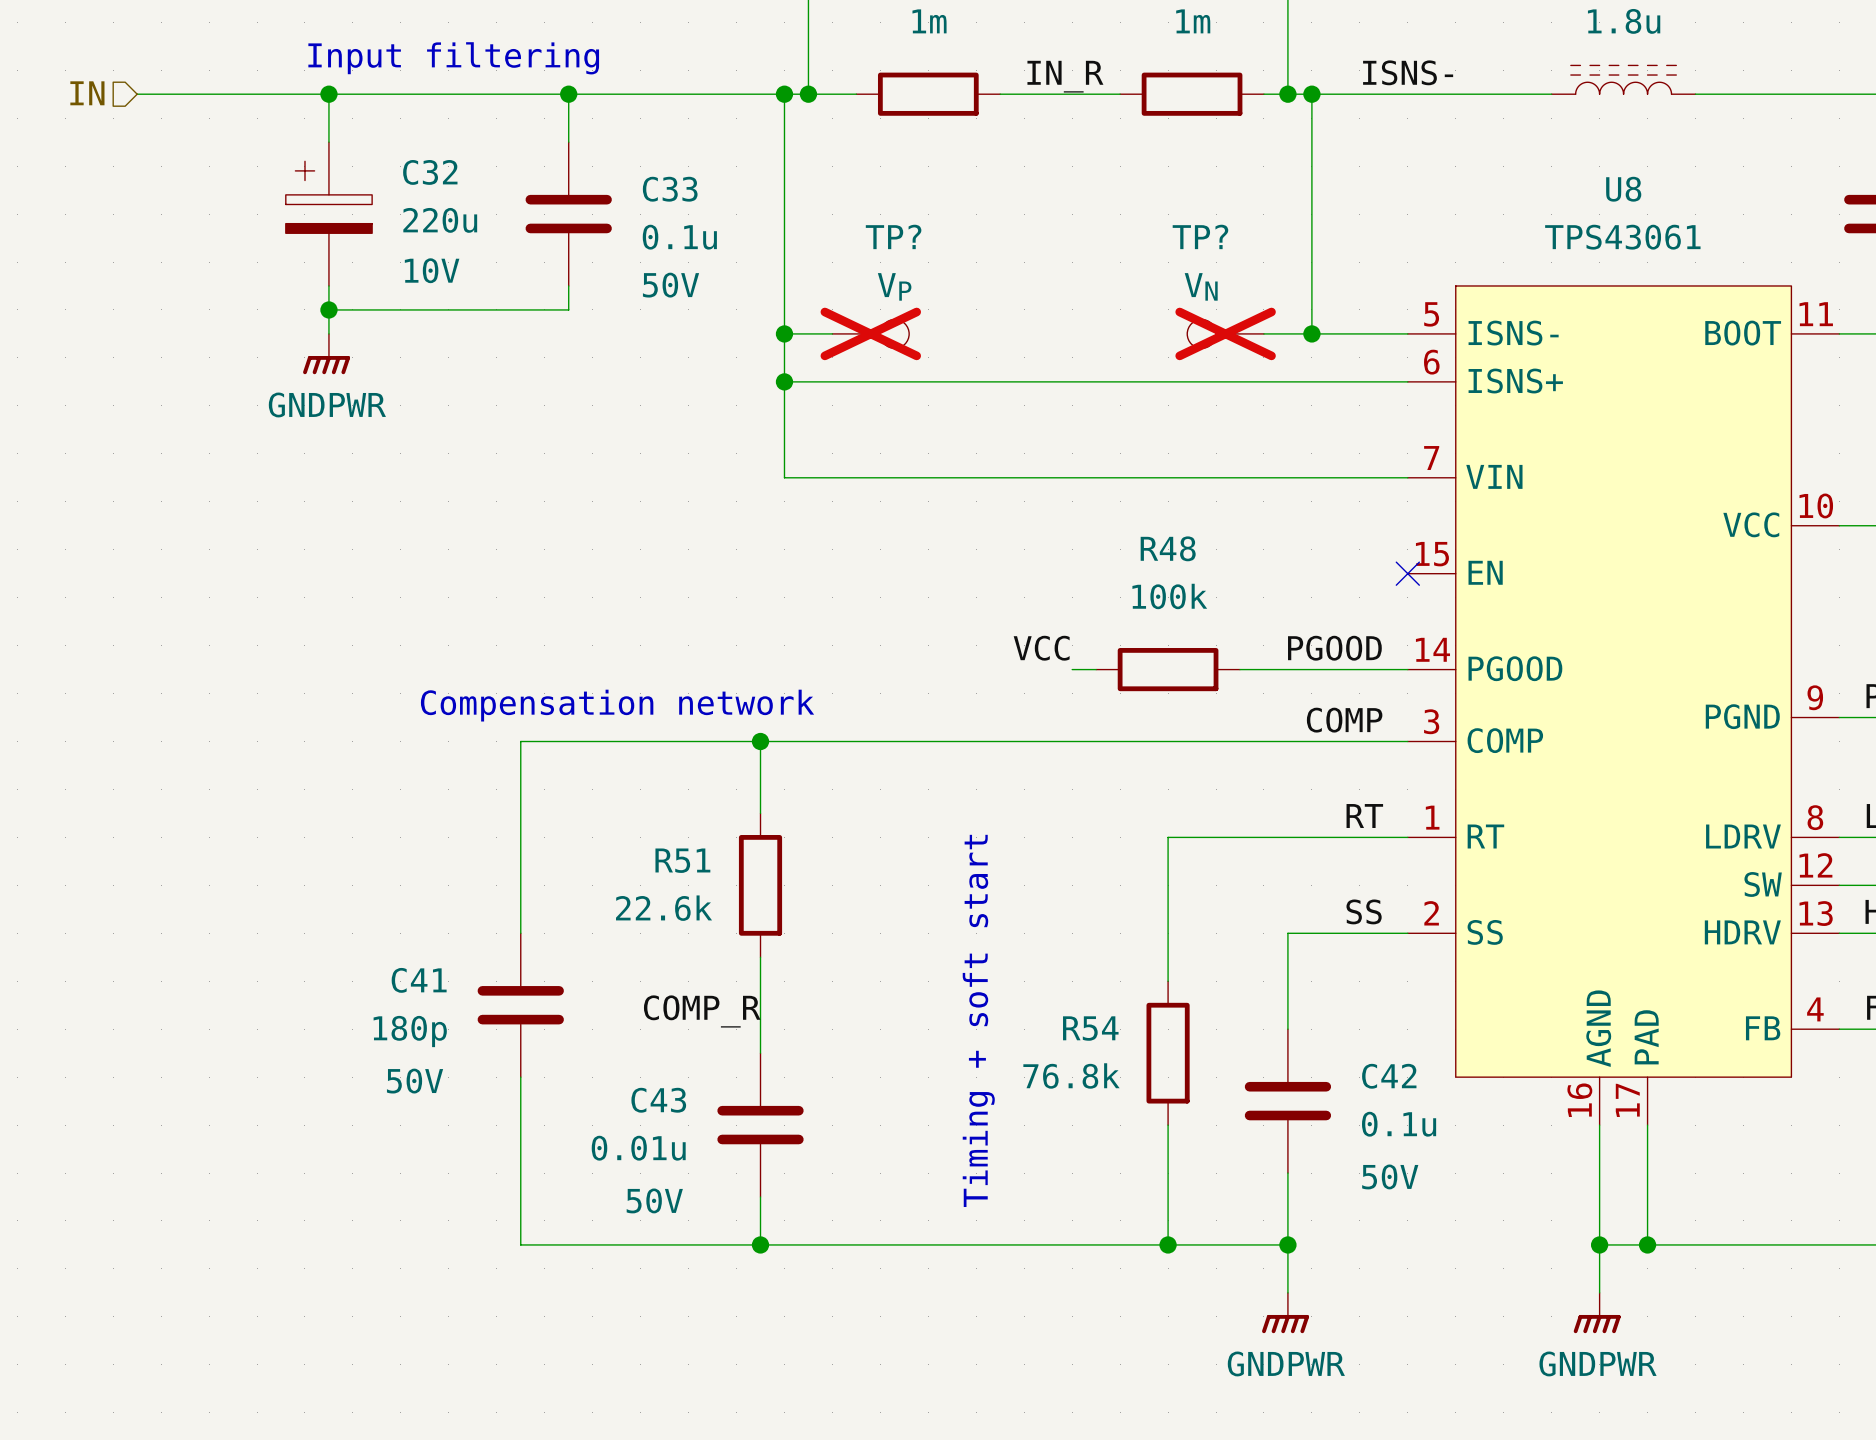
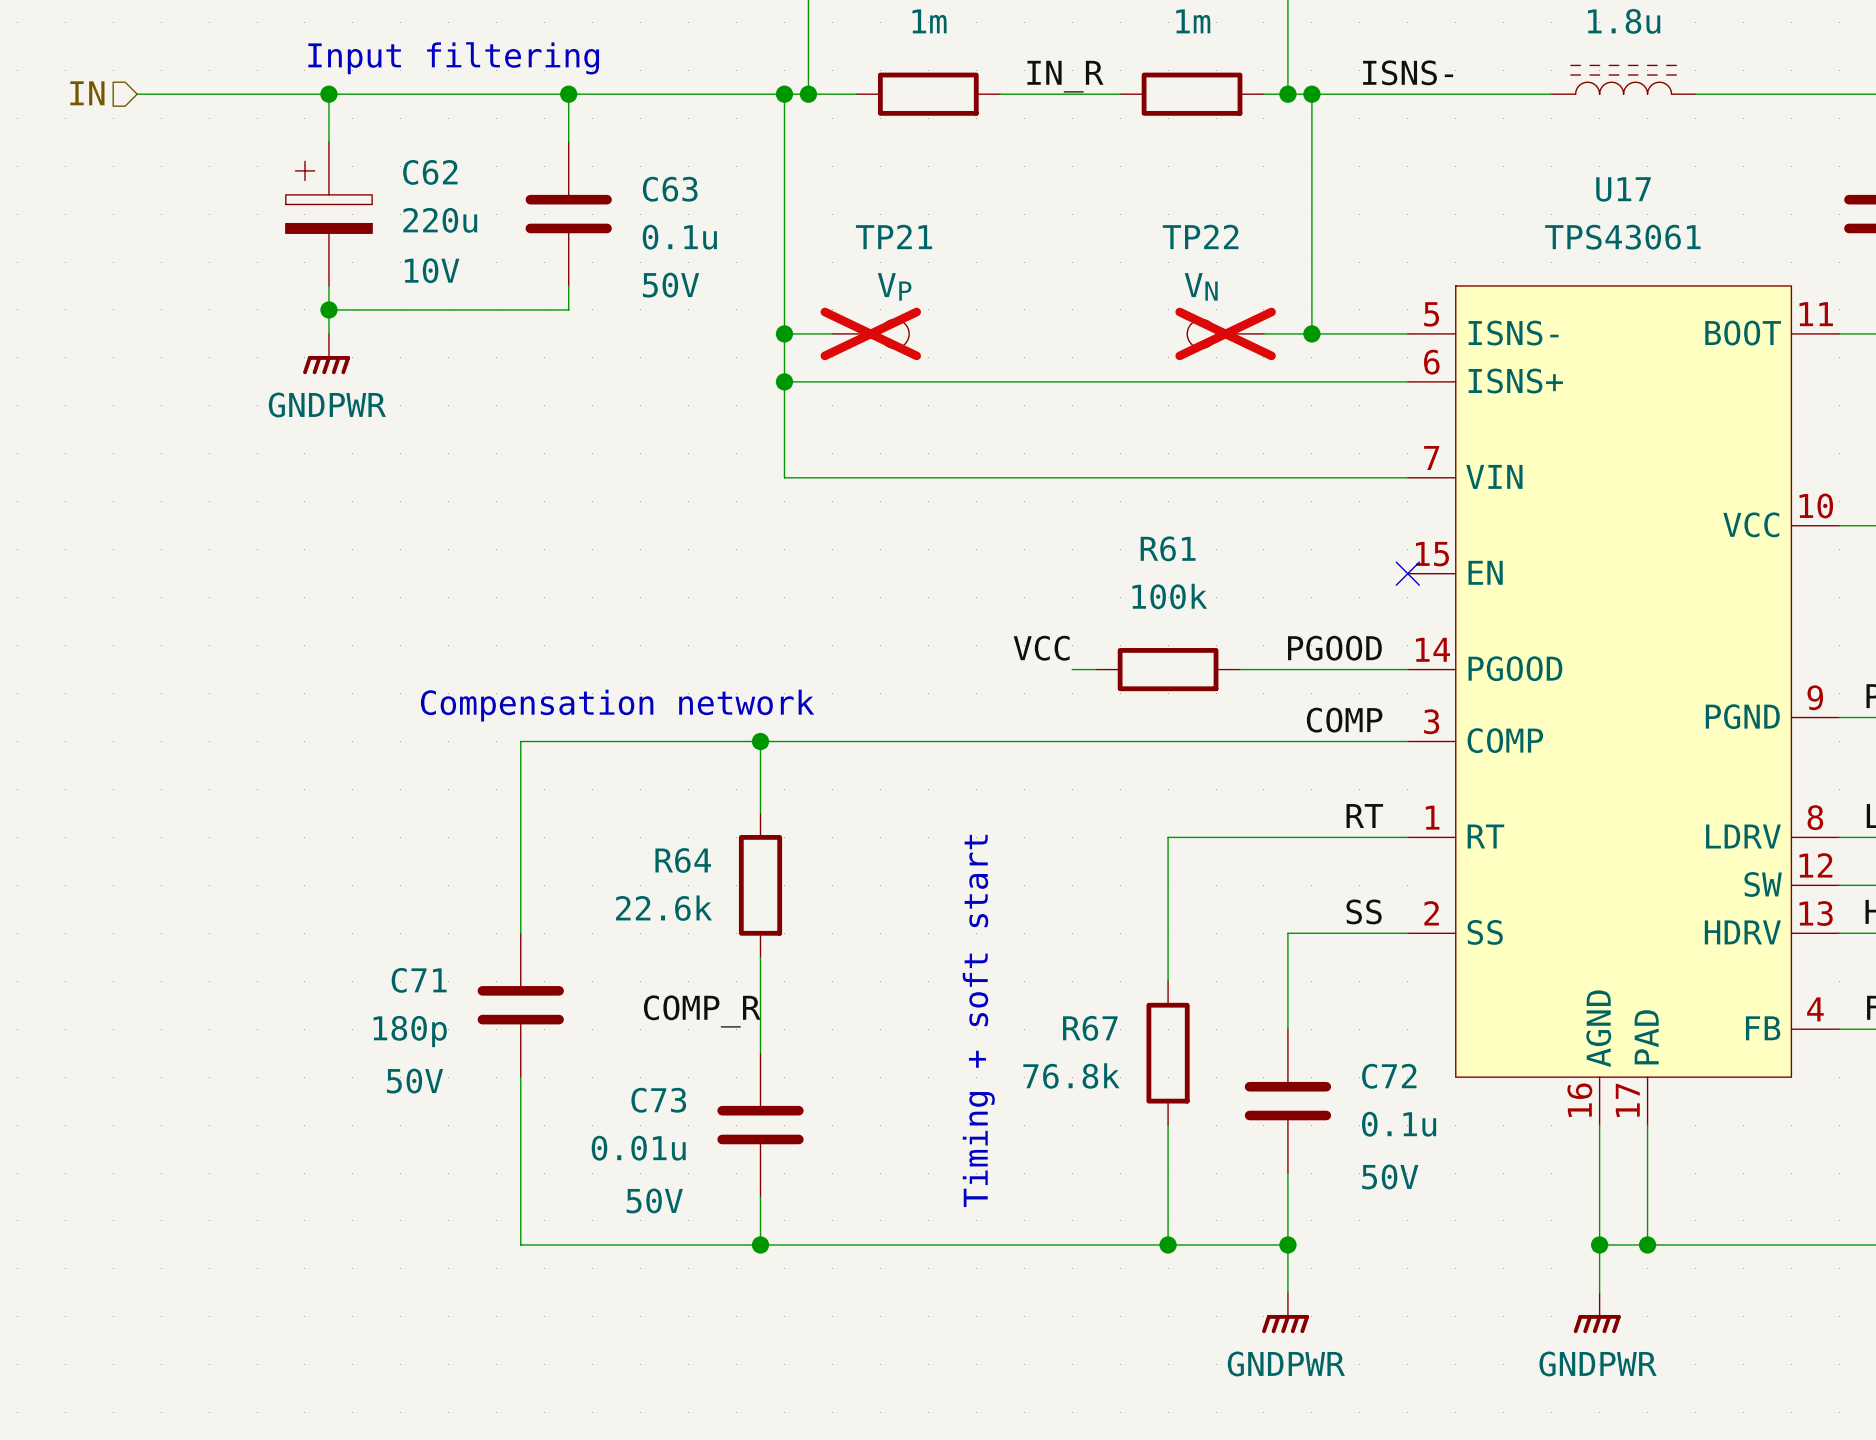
C32 name: C32 (430, 172) -> C62 (430, 172)
C33 name: C33 (670, 189) -> C63 (670, 189)
U8 name: U8 (1623, 189) -> U17 (1623, 189)
TP? name: TP? (893, 236) -> TP21 (894, 236)
TP? name: TP? (1200, 236) -> TP22 (1200, 236)
R48 name: R48 (1168, 548) -> R61 (1168, 548)
R51 name: R51 (682, 860) -> R64 (683, 860)
C41 name: C41 (419, 980) -> C71 (419, 980)
R54 name: R54 (1090, 1028) -> R67 (1090, 1028)
C42 name: C42 (1389, 1076) -> C72 (1389, 1076)
C43 name: C43 (658, 1100) -> C73 (658, 1100)

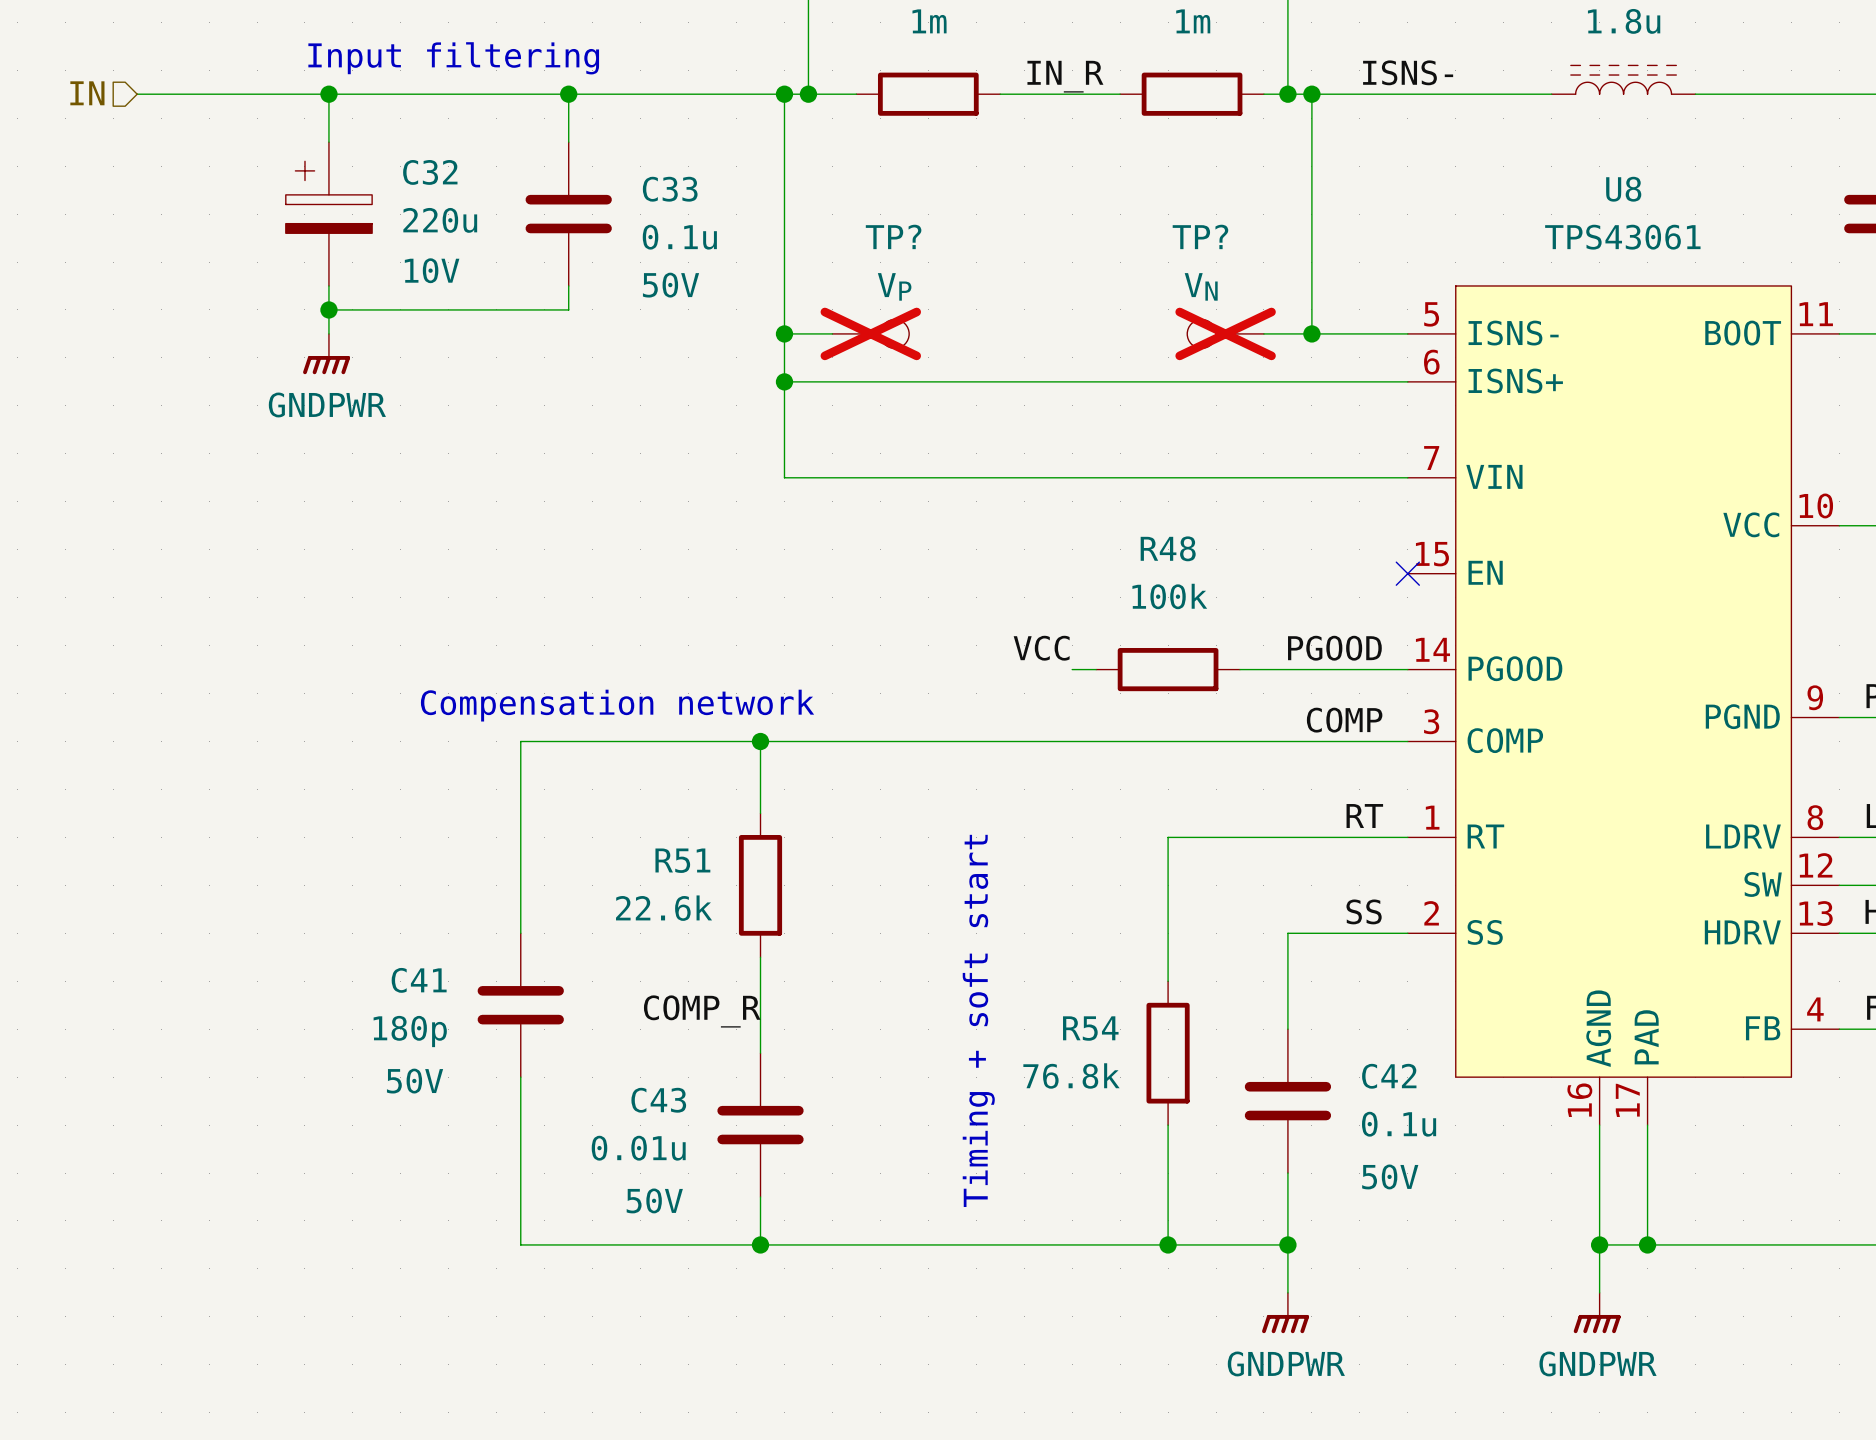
C62 name: C62 (430, 172) -> C32 (430, 172)
C63 name: C63 (670, 189) -> C33 (670, 189)
U17 name: U17 (1623, 189) -> U8 (1623, 189)
TP21 name: TP21 (894, 236) -> TP? (893, 236)
TP22 name: TP22 (1200, 236) -> TP? (1200, 236)
R61 name: R61 (1168, 548) -> R48 (1168, 548)
R64 name: R64 (683, 860) -> R51 (682, 860)
C71 name: C71 (419, 980) -> C41 (419, 980)
R67 name: R67 (1090, 1028) -> R54 (1090, 1028)
C72 name: C72 (1389, 1076) -> C42 (1389, 1076)
C73 name: C73 (658, 1100) -> C43 (658, 1100)

